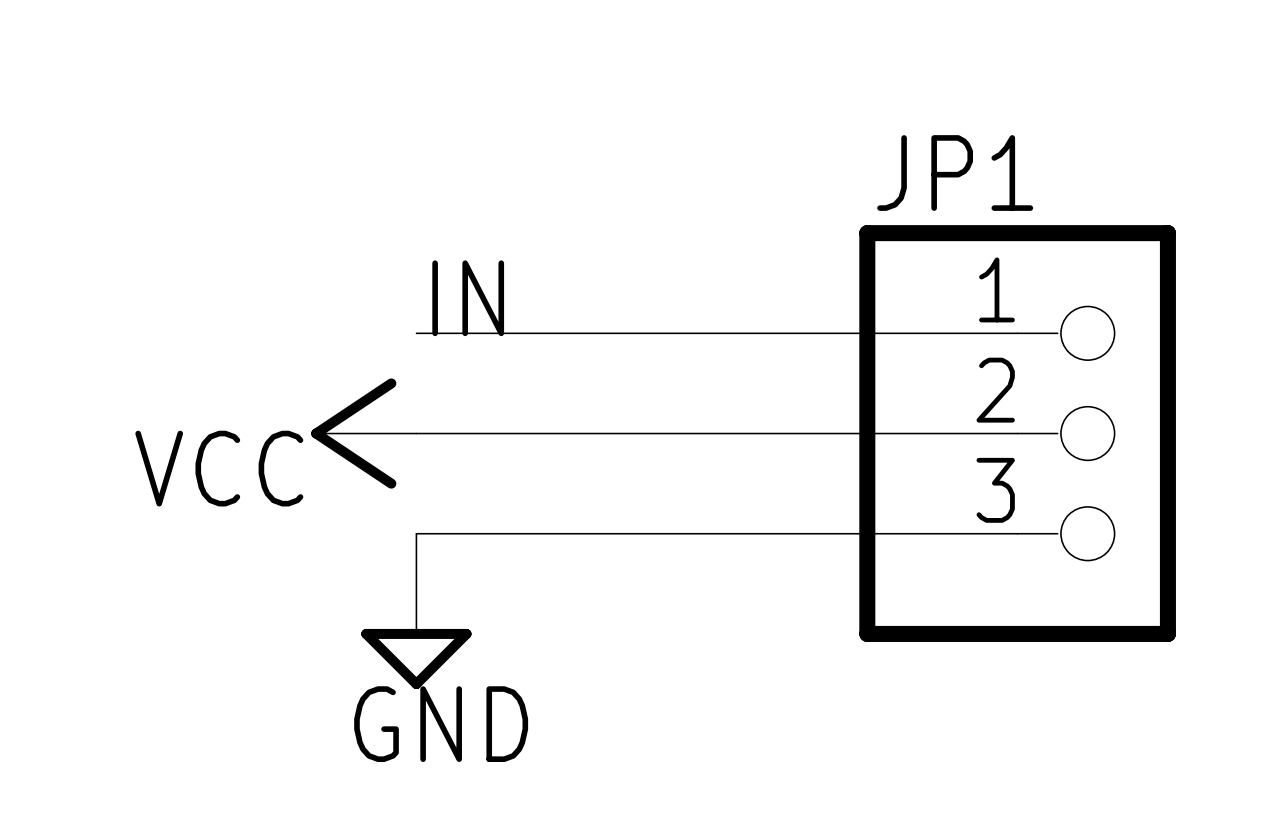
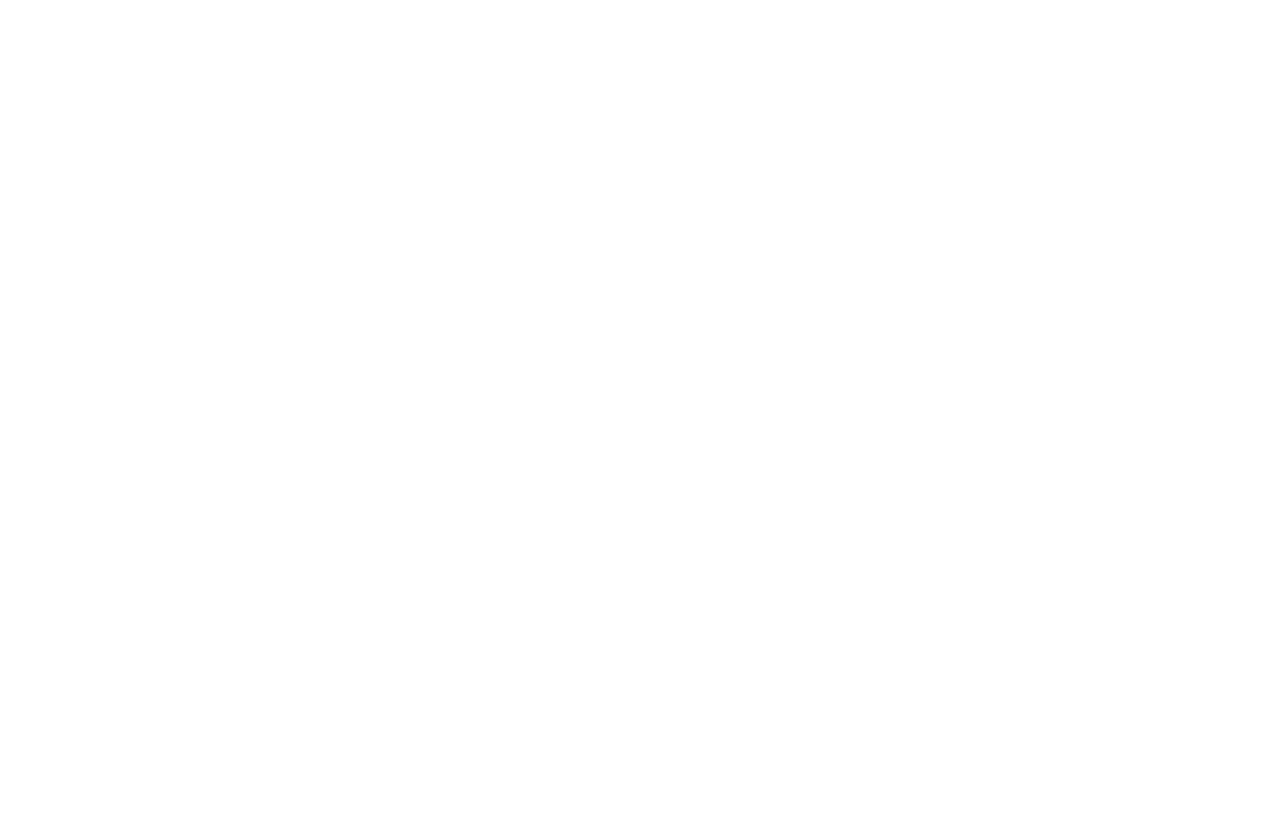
label: IN (468, 298) -> none
wire: (416, 333) (1017, 333) -> none
power symbol: VCC (363, 433) -> none
wire: (416, 433) (1017, 433) -> none
JP1: (1017, 433) -> none
wire: (416, 533) (1017, 533) -> none
power symbol: GND (416, 611) -> none

